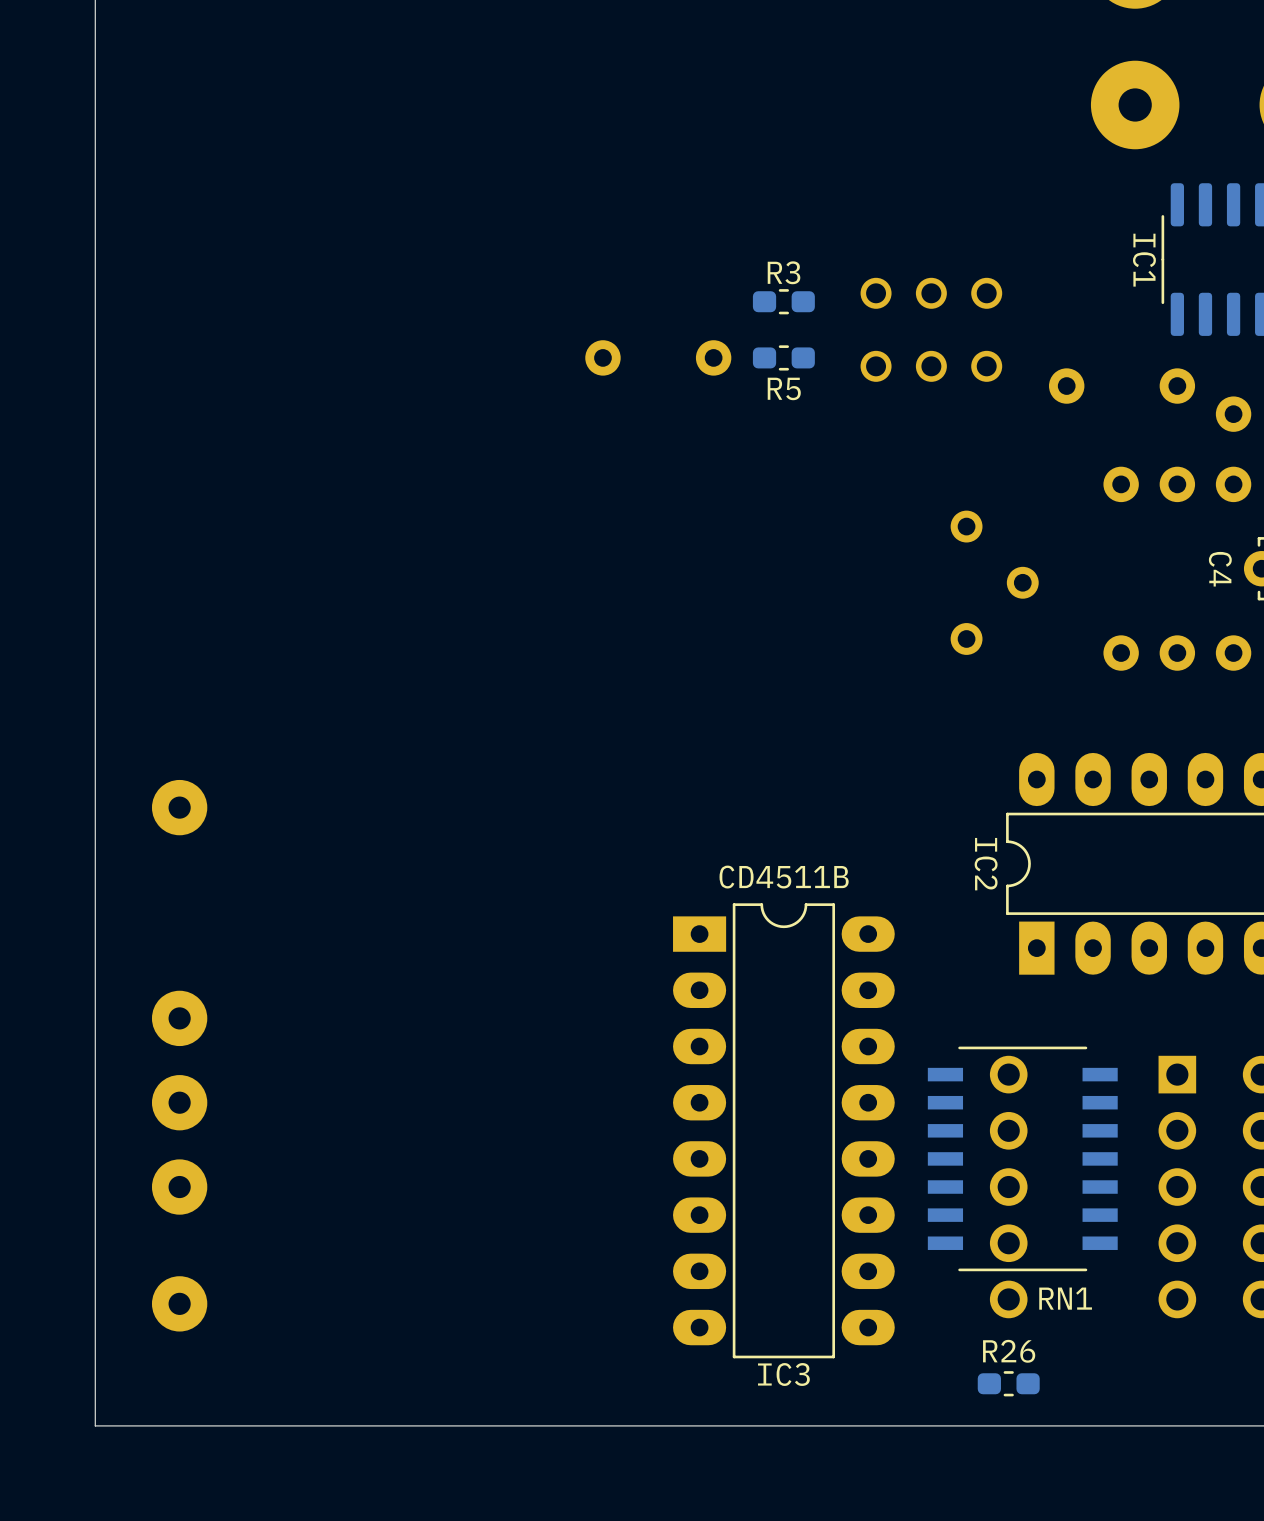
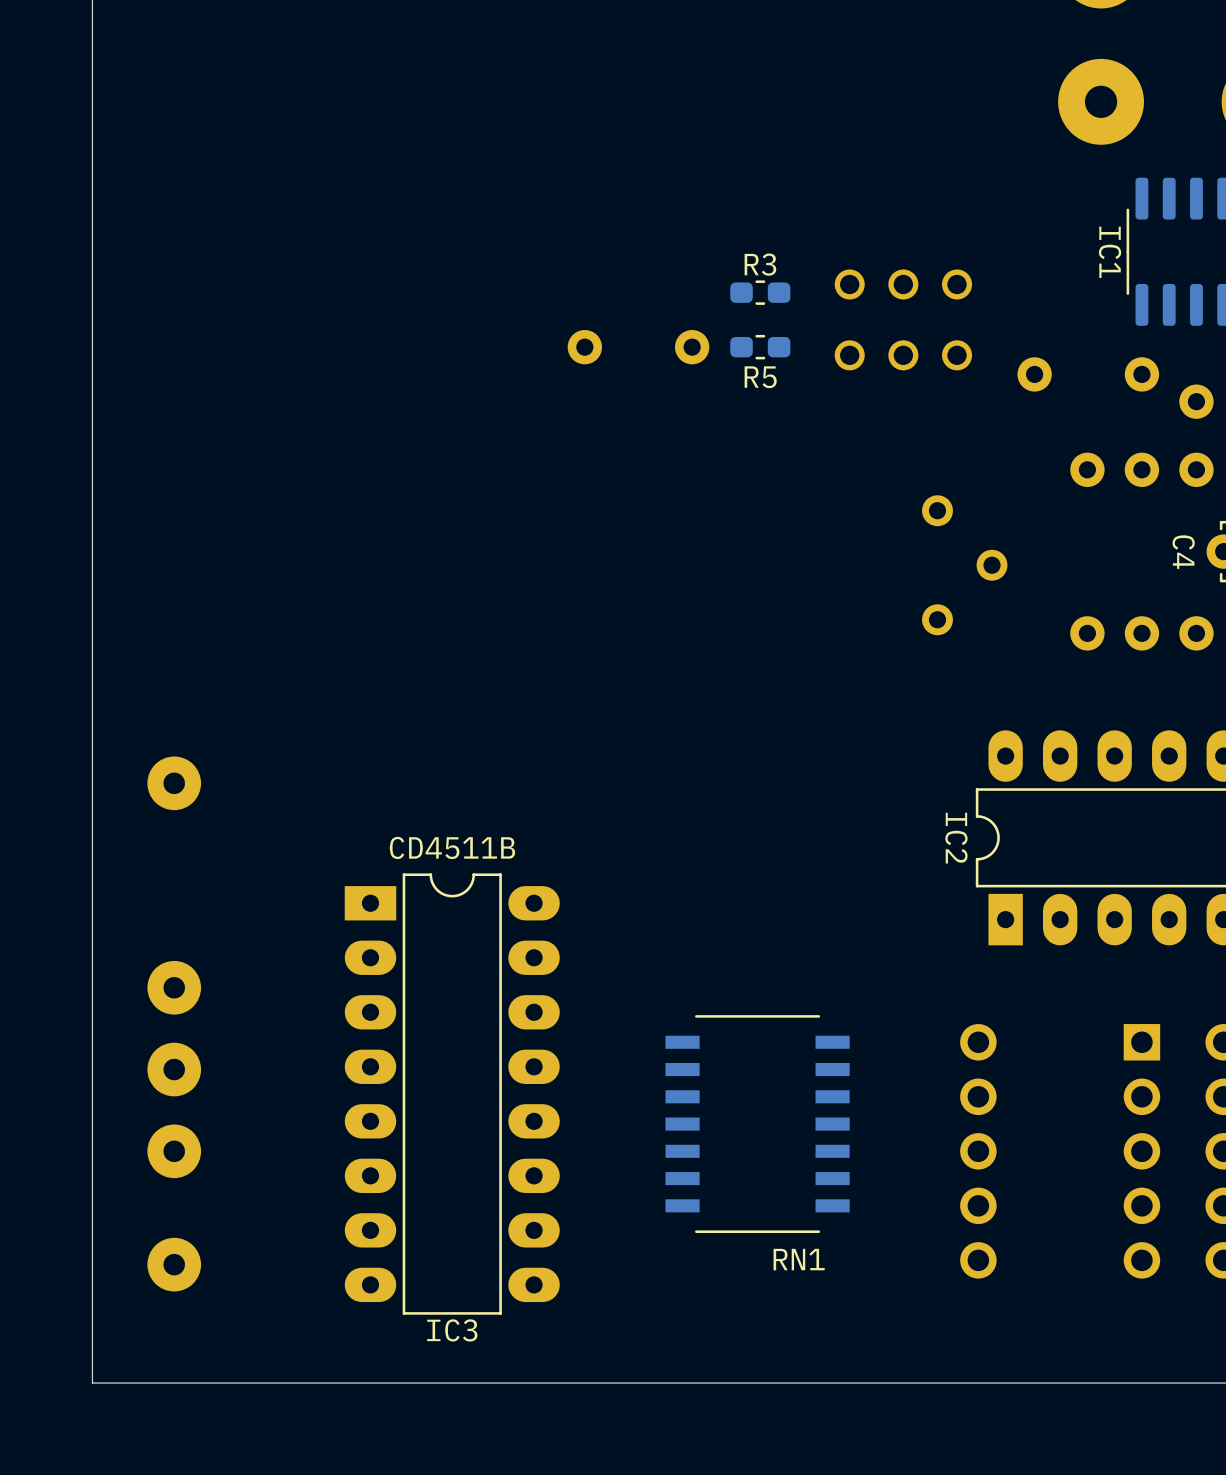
IC3 position: (783, 1130) -> (452, 1094)
RN1 position: (1022, 1158) -> (757, 1124)
R26: (1008, 1383) -> none

